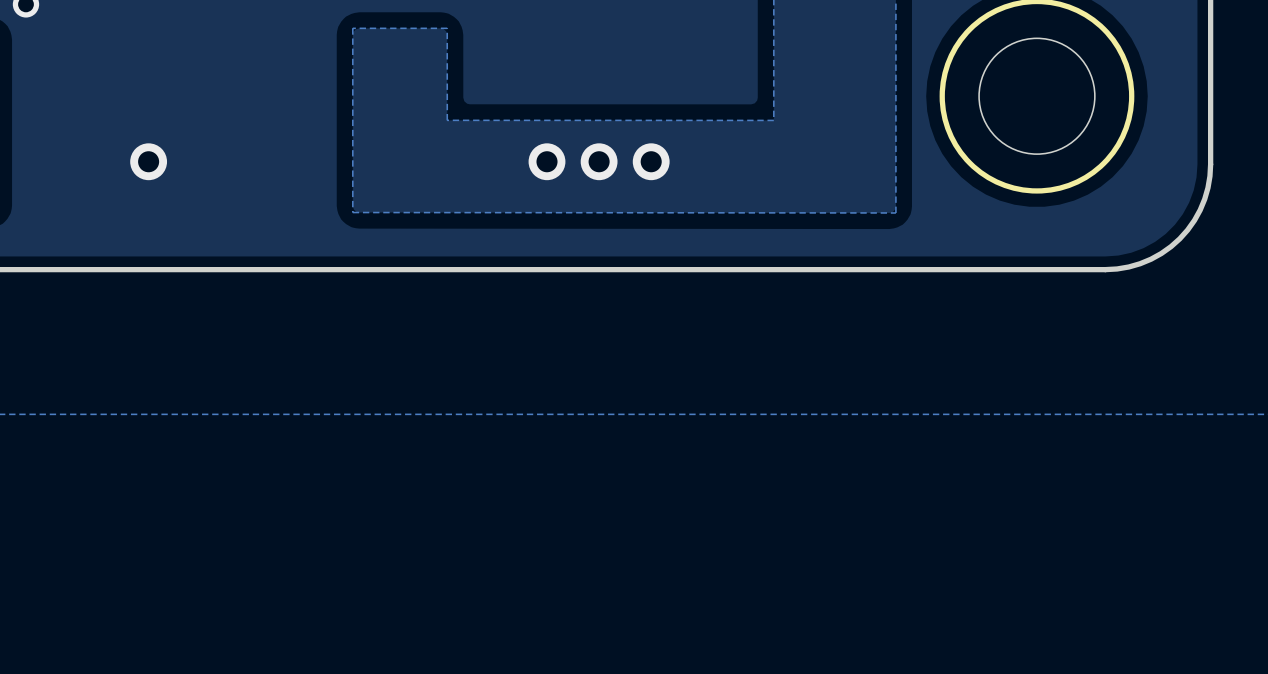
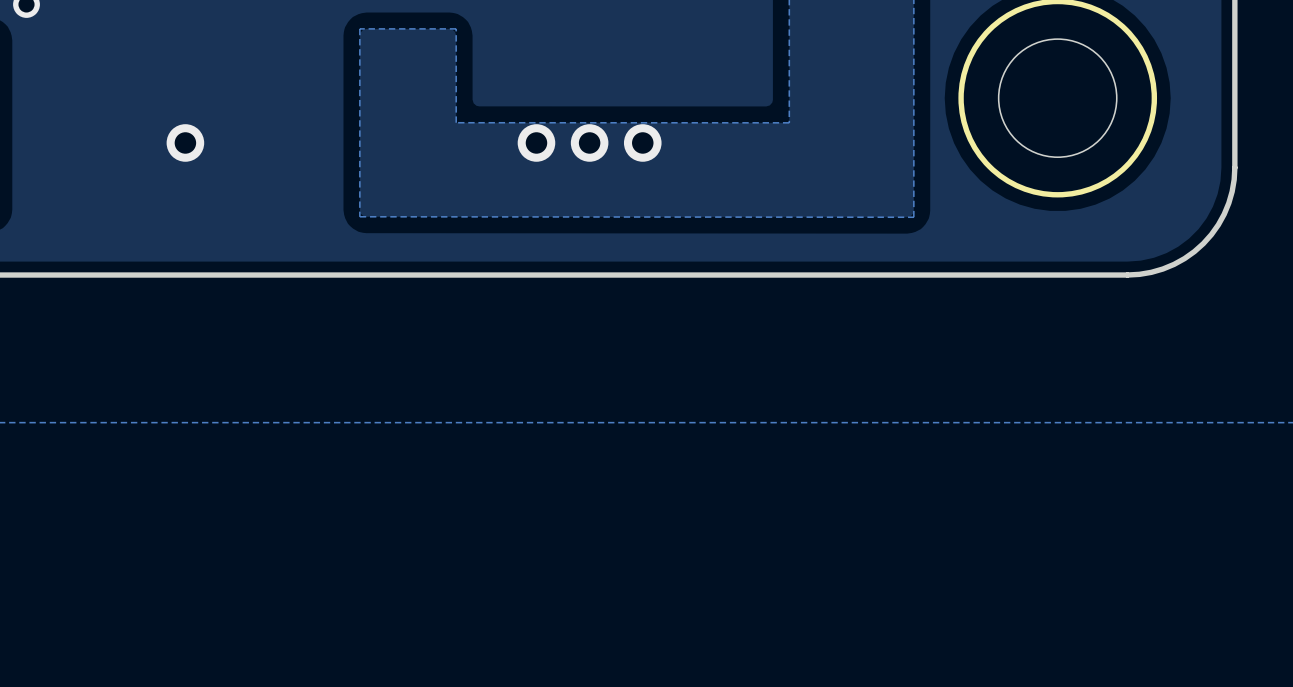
via: none -> (536, 142)
via: none -> (589, 142)
via: none -> (642, 142)
via position: (148, 161) -> (185, 142)
via: (547, 161) -> none
via: (599, 161) -> none
via: (651, 161) -> none

